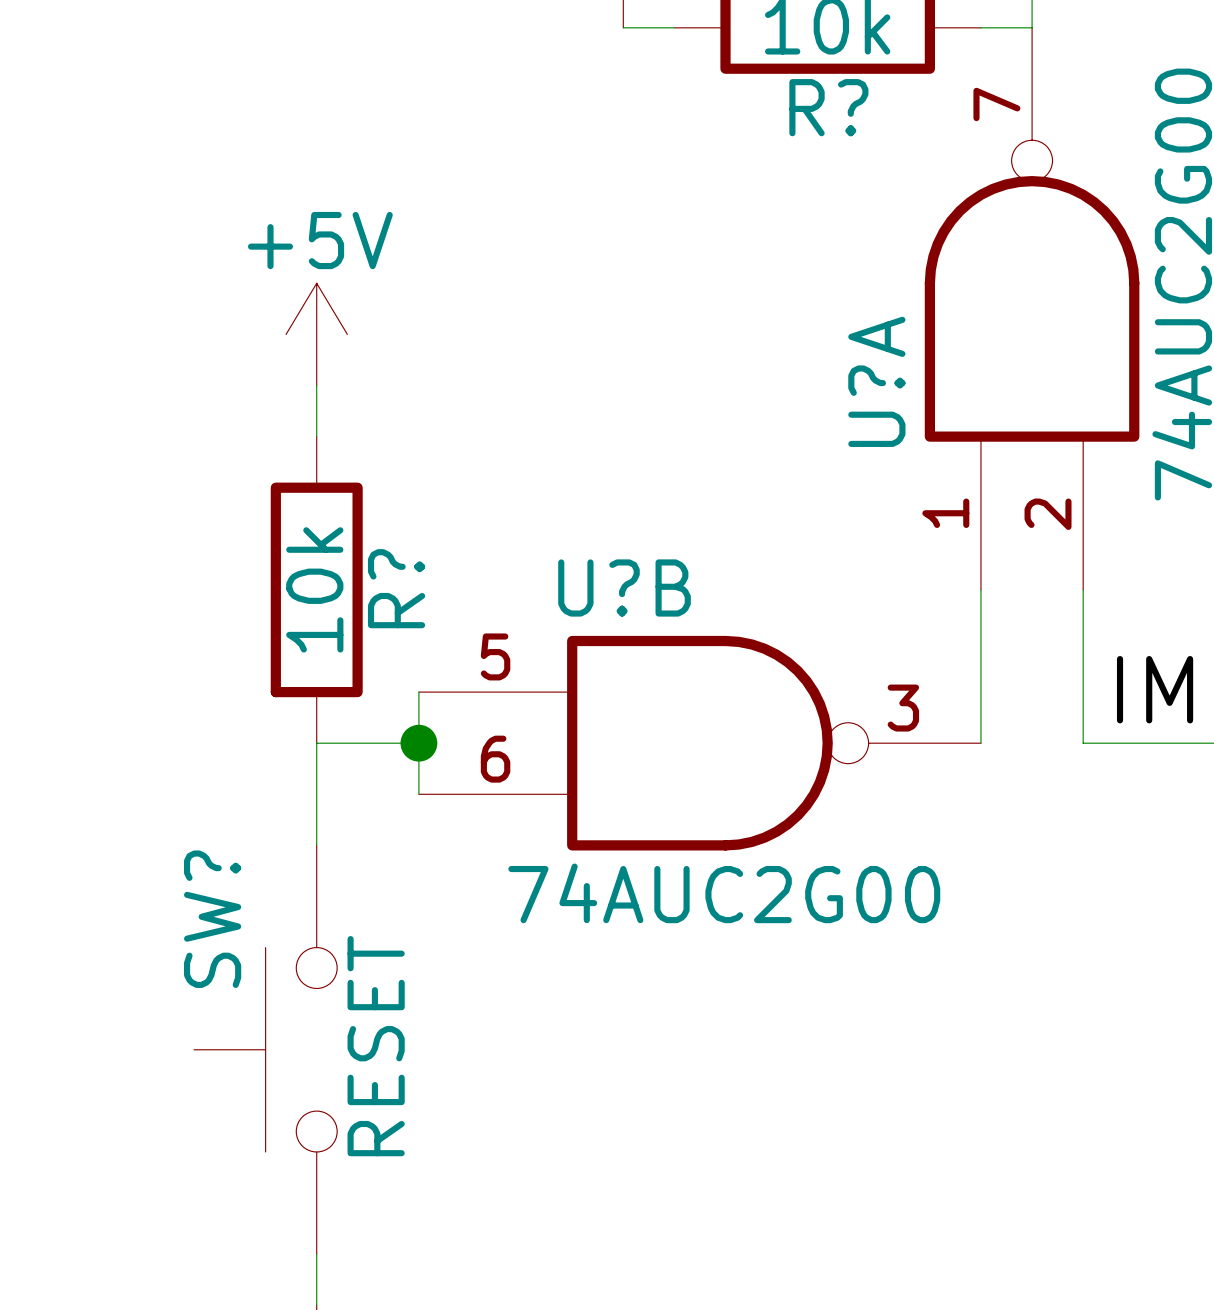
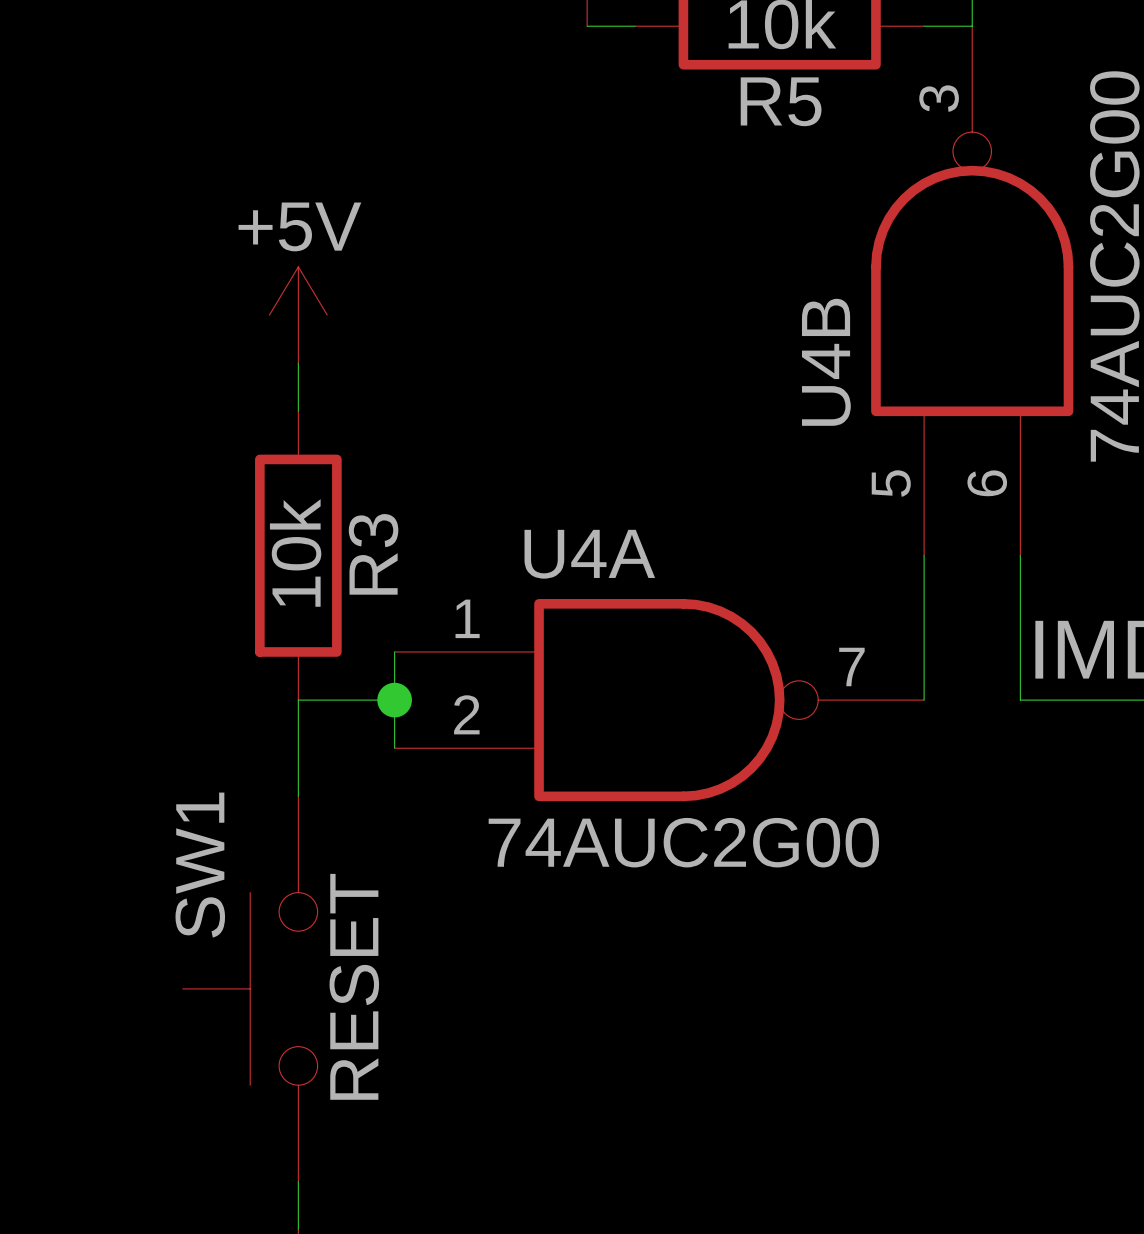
U?A pin number: 7 (996, 104) -> 3 (939, 98)
R? name: R? (828, 107) -> R5 (781, 101)
U?A name: U?A (876, 381) -> U4B (826, 362)
U?A pin number: 1 (945, 513) -> 5 (891, 483)
U?A pin number: 2 (1048, 514) -> 6 (987, 483)
U?B name: U?B (624, 587) -> U4A (589, 554)
R? name: R? (396, 588) -> R3 (373, 554)
U?B pin number: 5 (495, 656) -> 1 (467, 618)
U?B pin number: 3 (903, 708) -> 7 (851, 666)
U?B pin number: 6 (495, 759) -> 2 (466, 714)
SW? name: SW? (212, 919) -> SW1 (200, 865)

